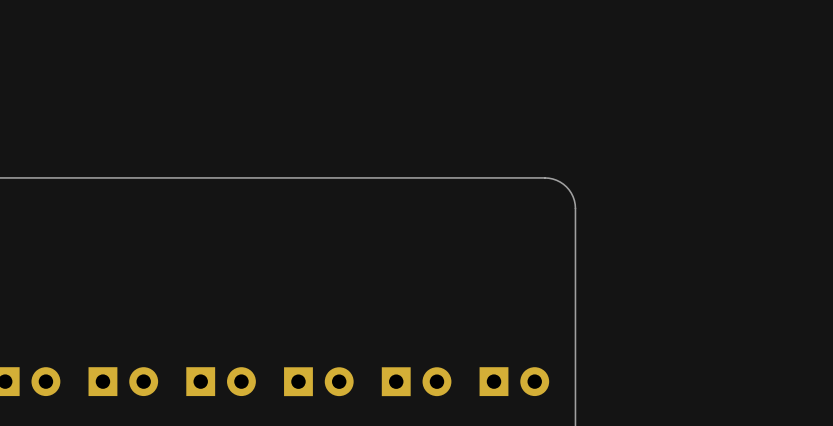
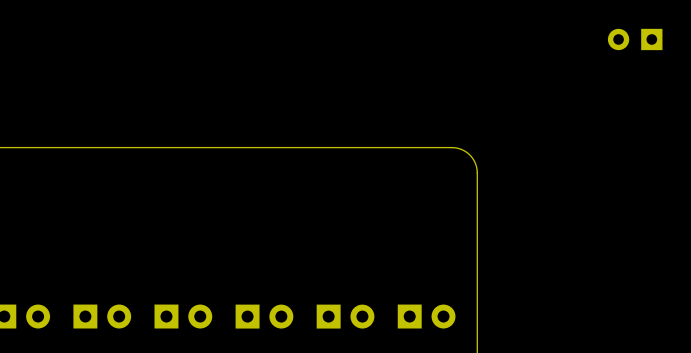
part: none -> (635, 39)

